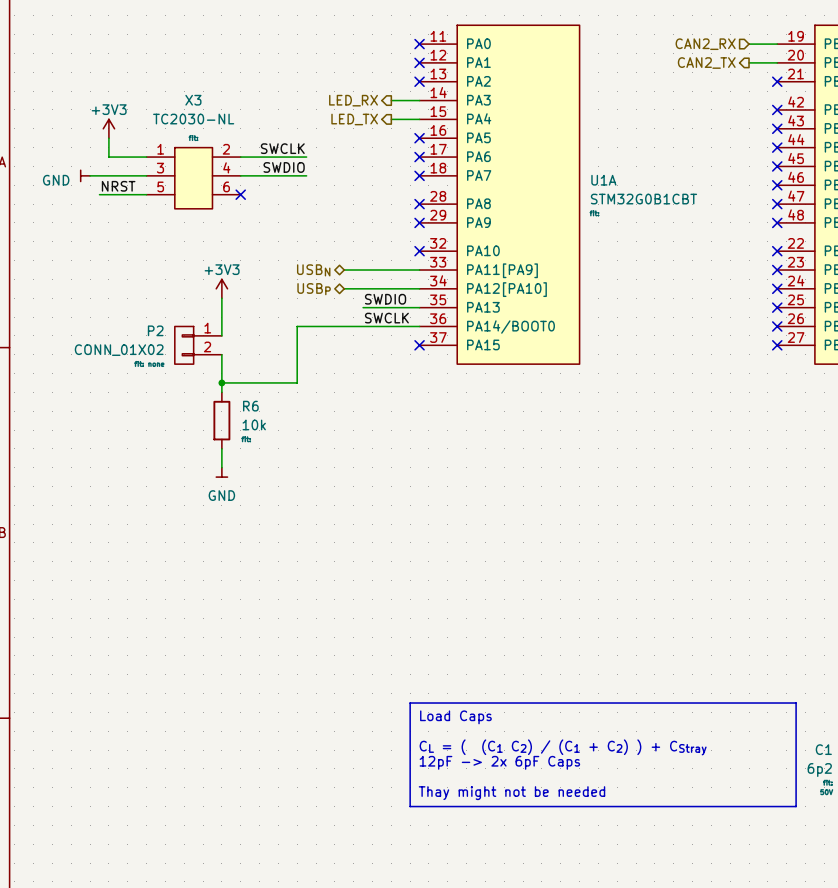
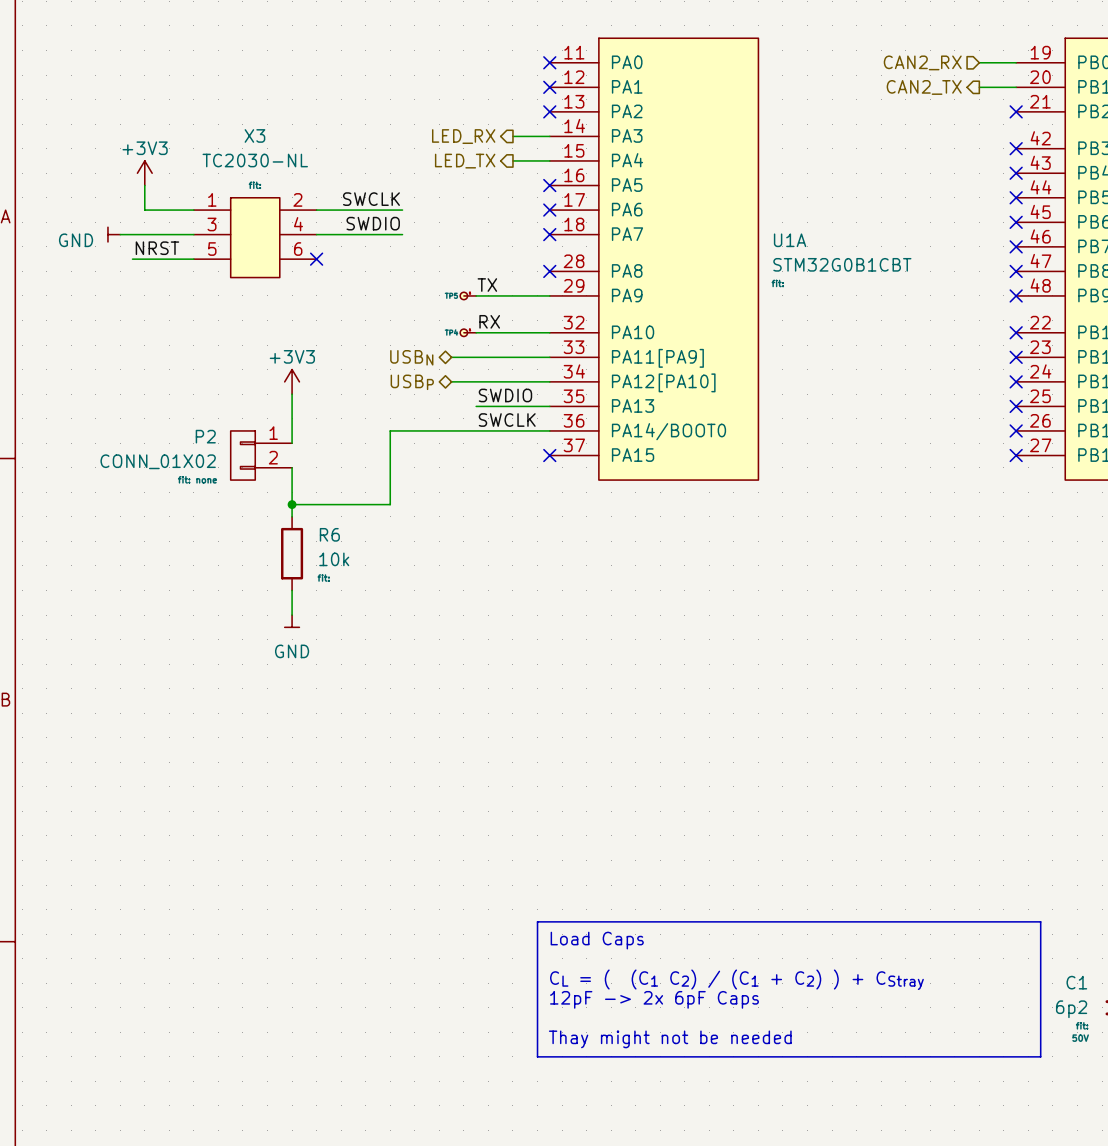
label: none -> TX (487, 285)
part: none -> (468, 295)
wire: none -> (476, 295) (549, 295)
no-connect mark: (419, 222) -> none
label: none -> RX (489, 321)
part: none -> (468, 332)
wire: none -> (476, 332) (549, 332)
no-connect mark: (419, 251) -> none

